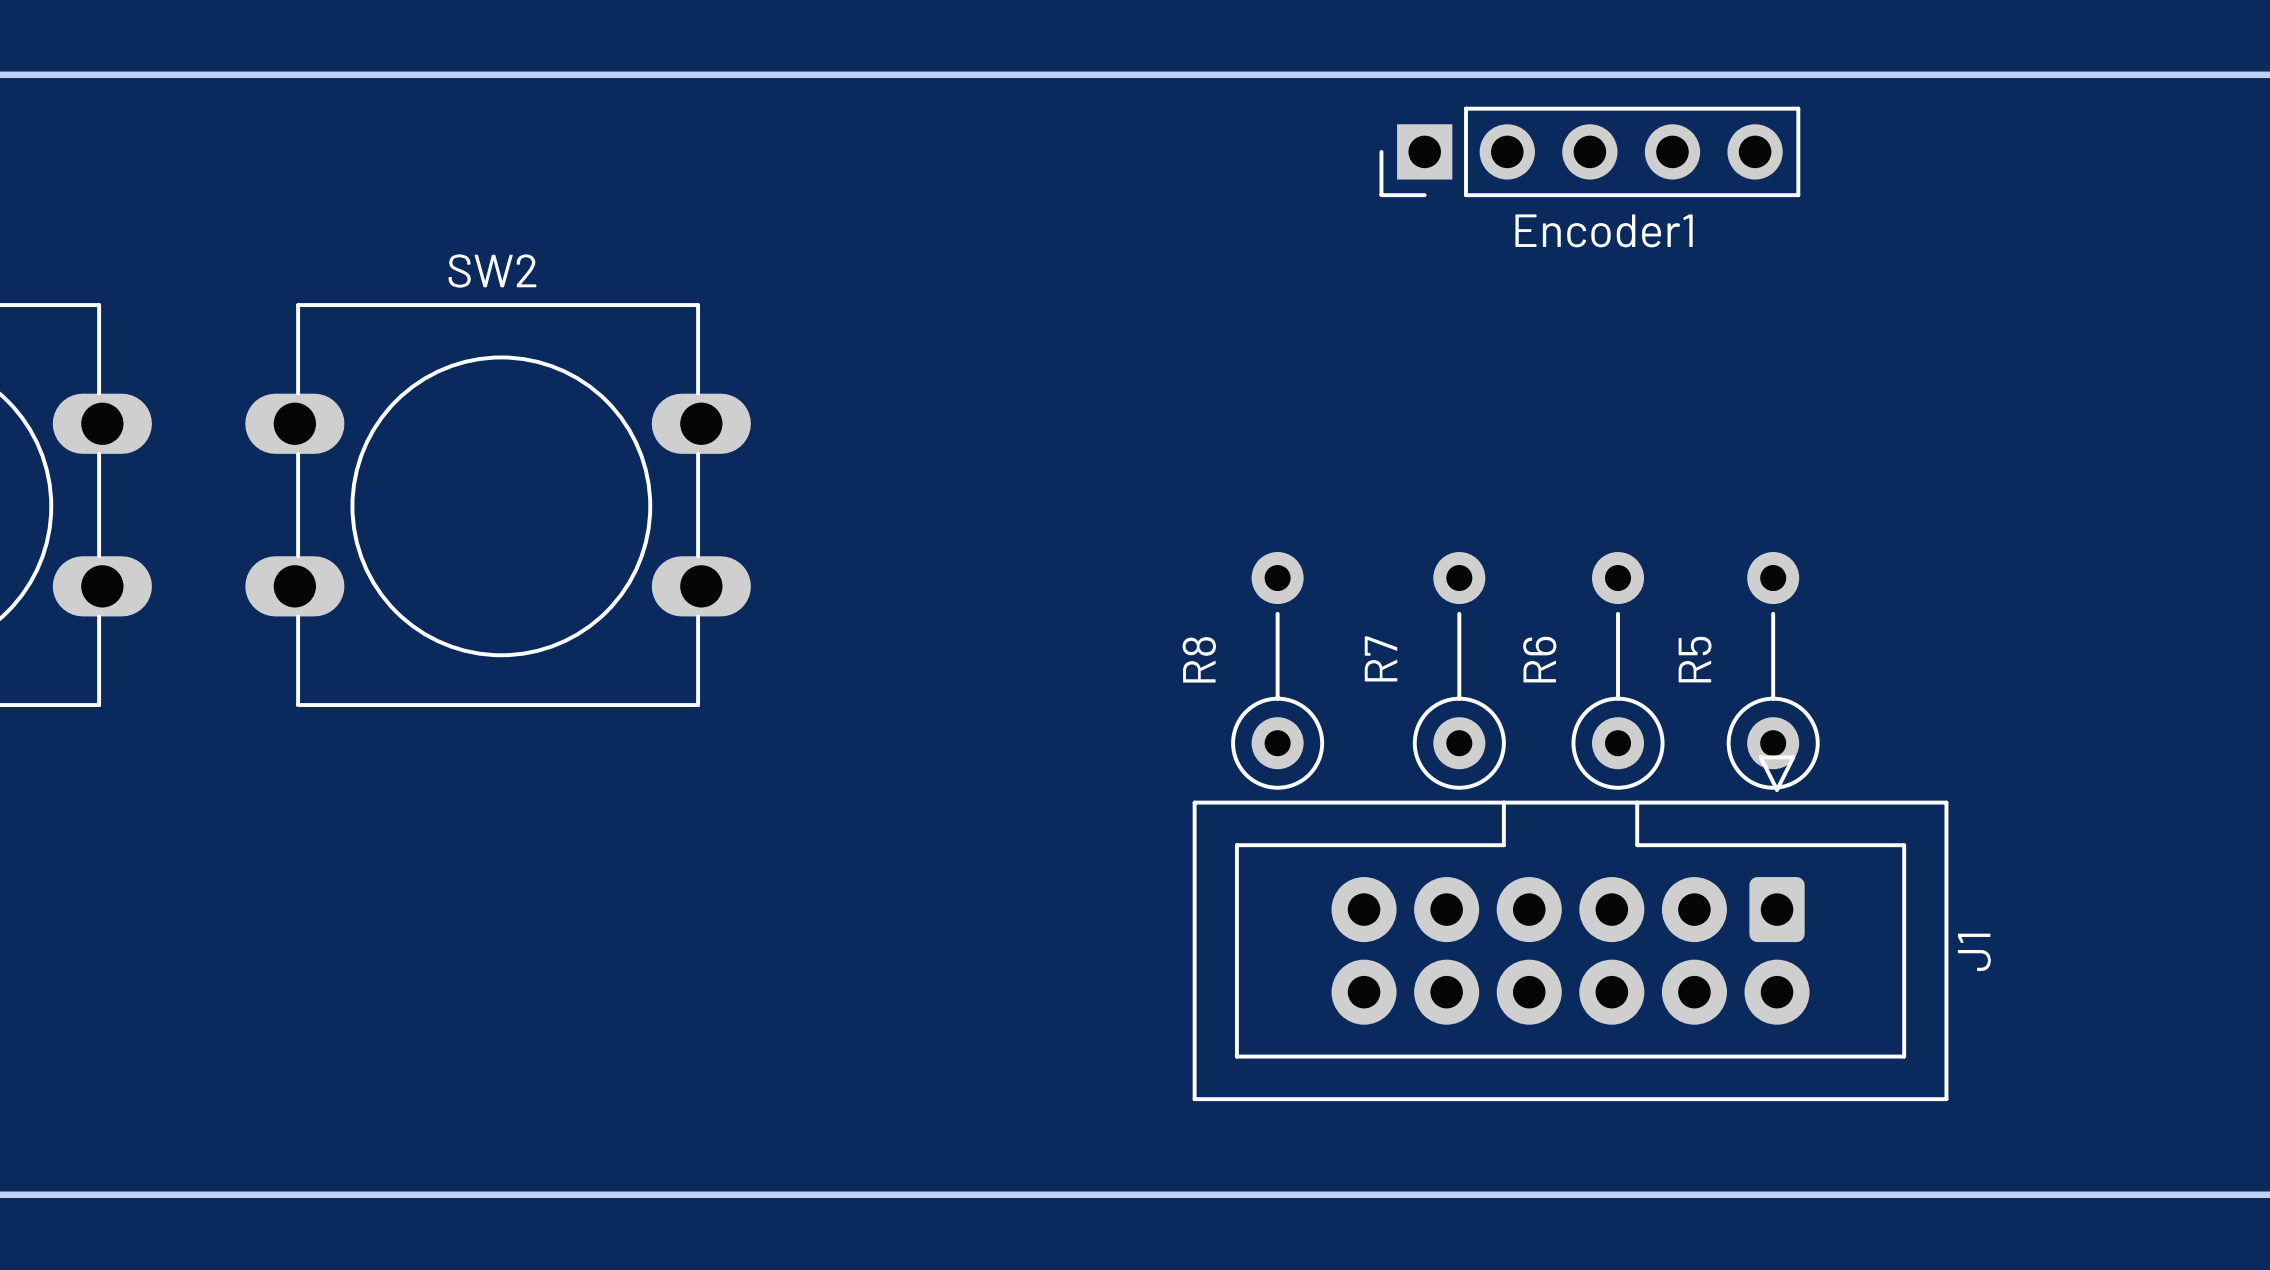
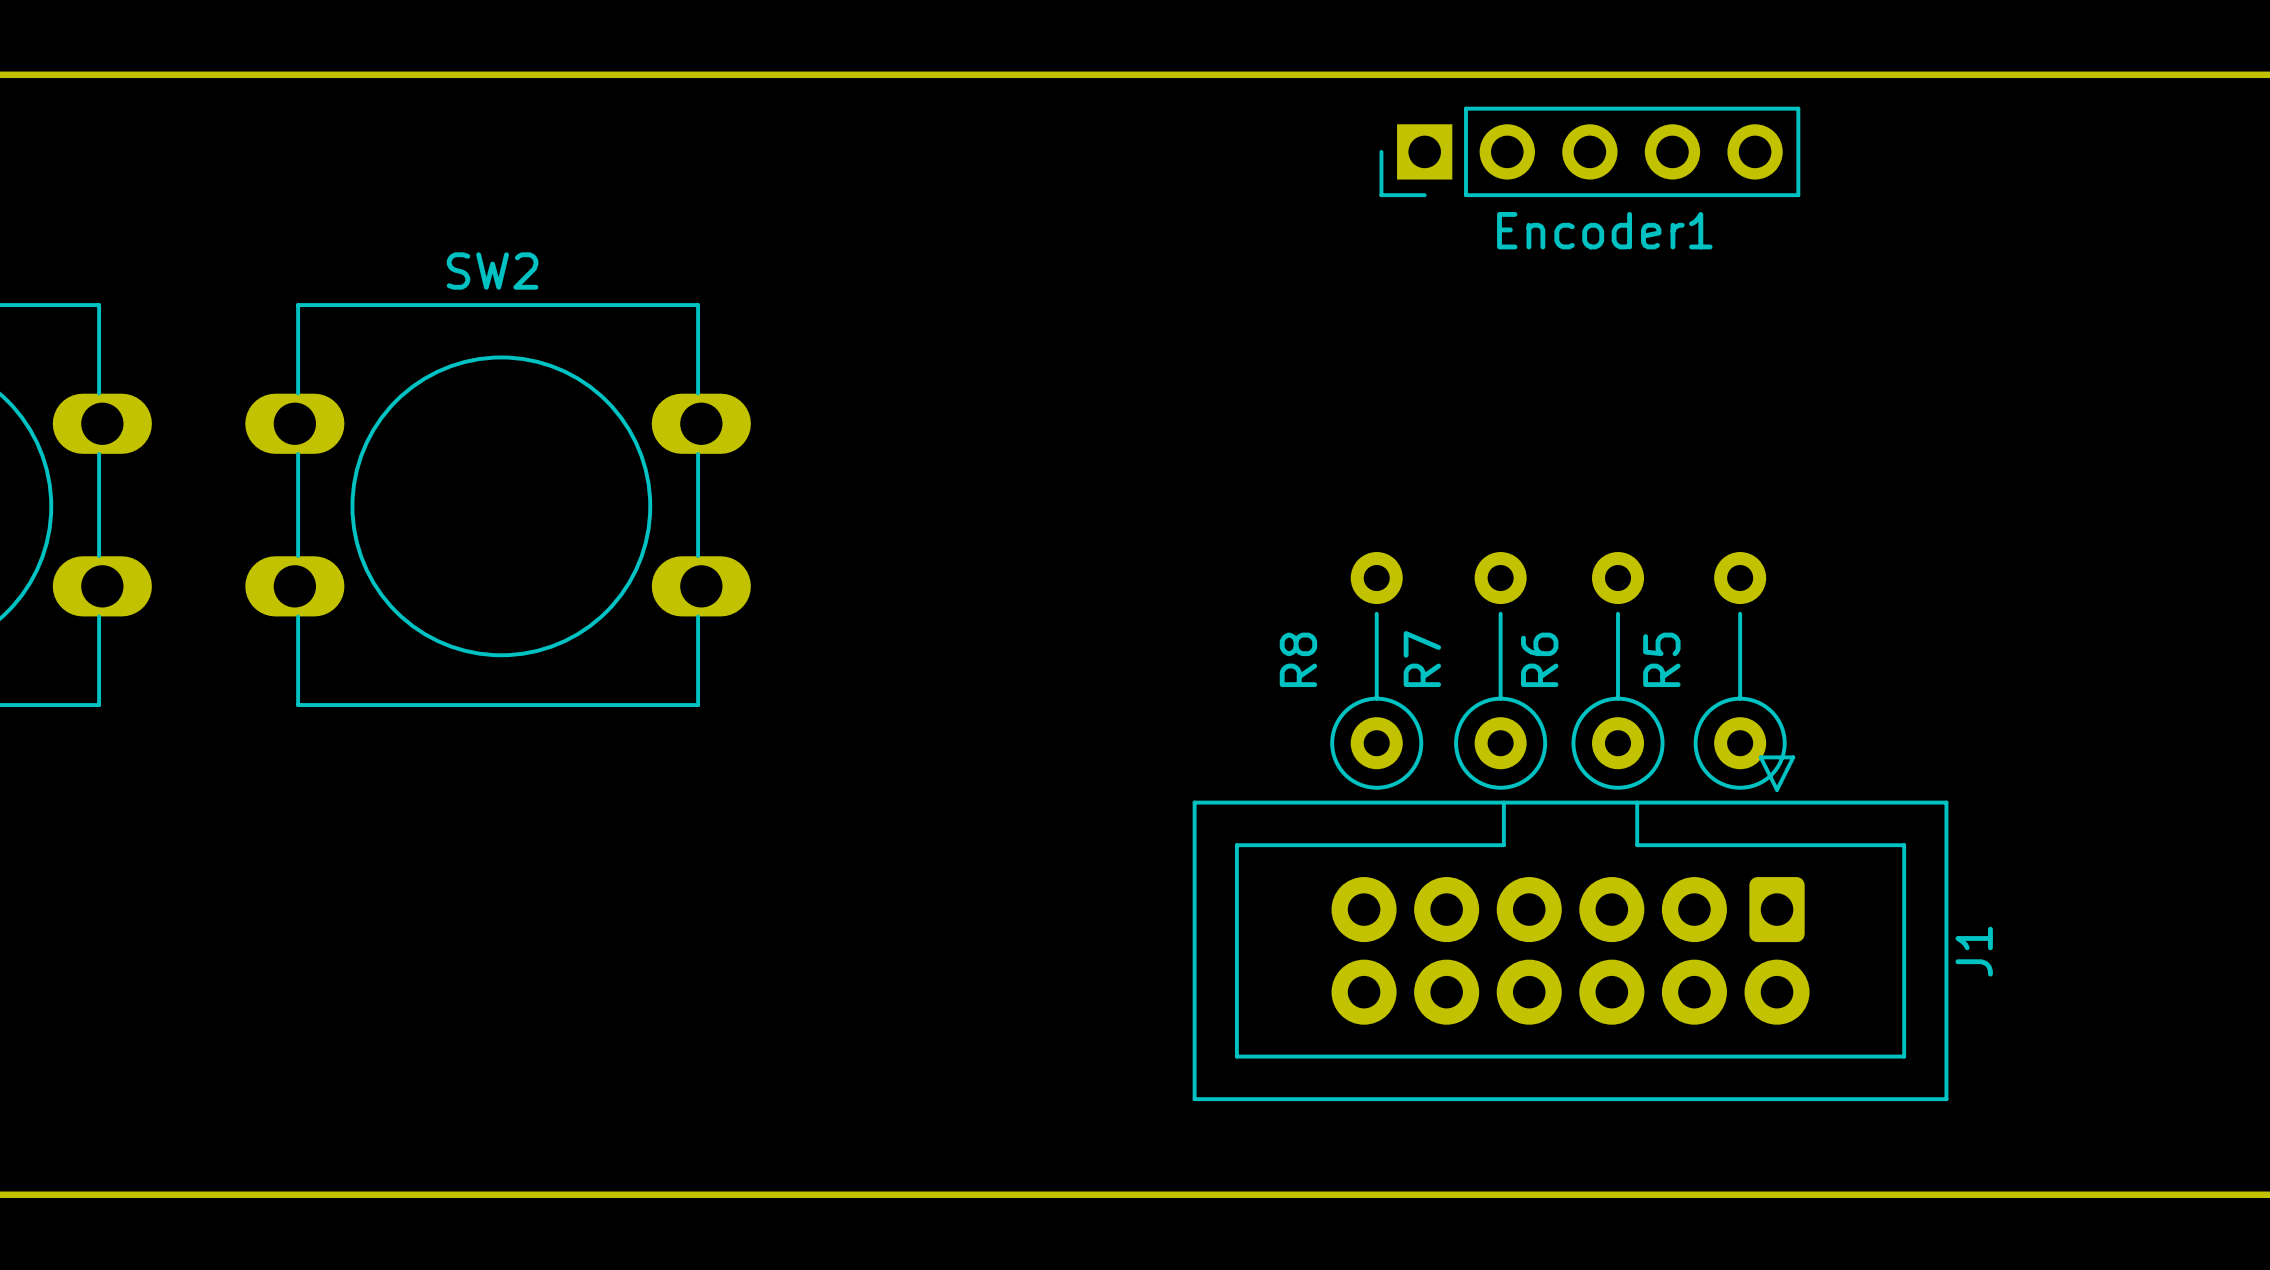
R8 position: (1277, 670) -> (1376, 670)
R7 position: (1459, 670) -> (1500, 670)
R5 position: (1773, 670) -> (1740, 670)

